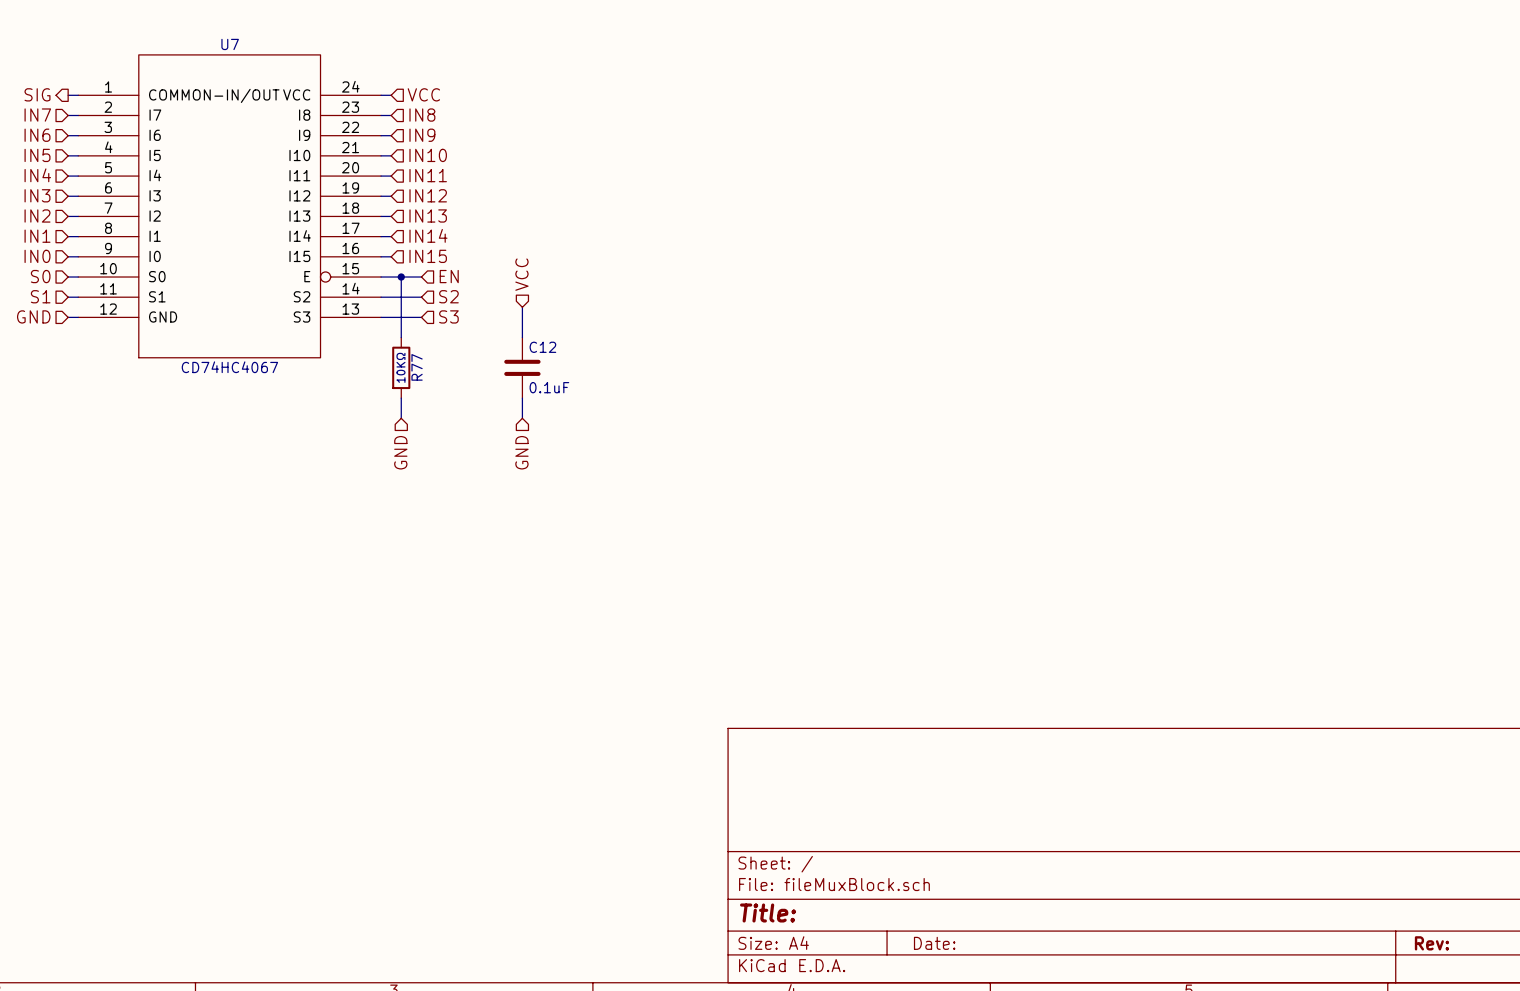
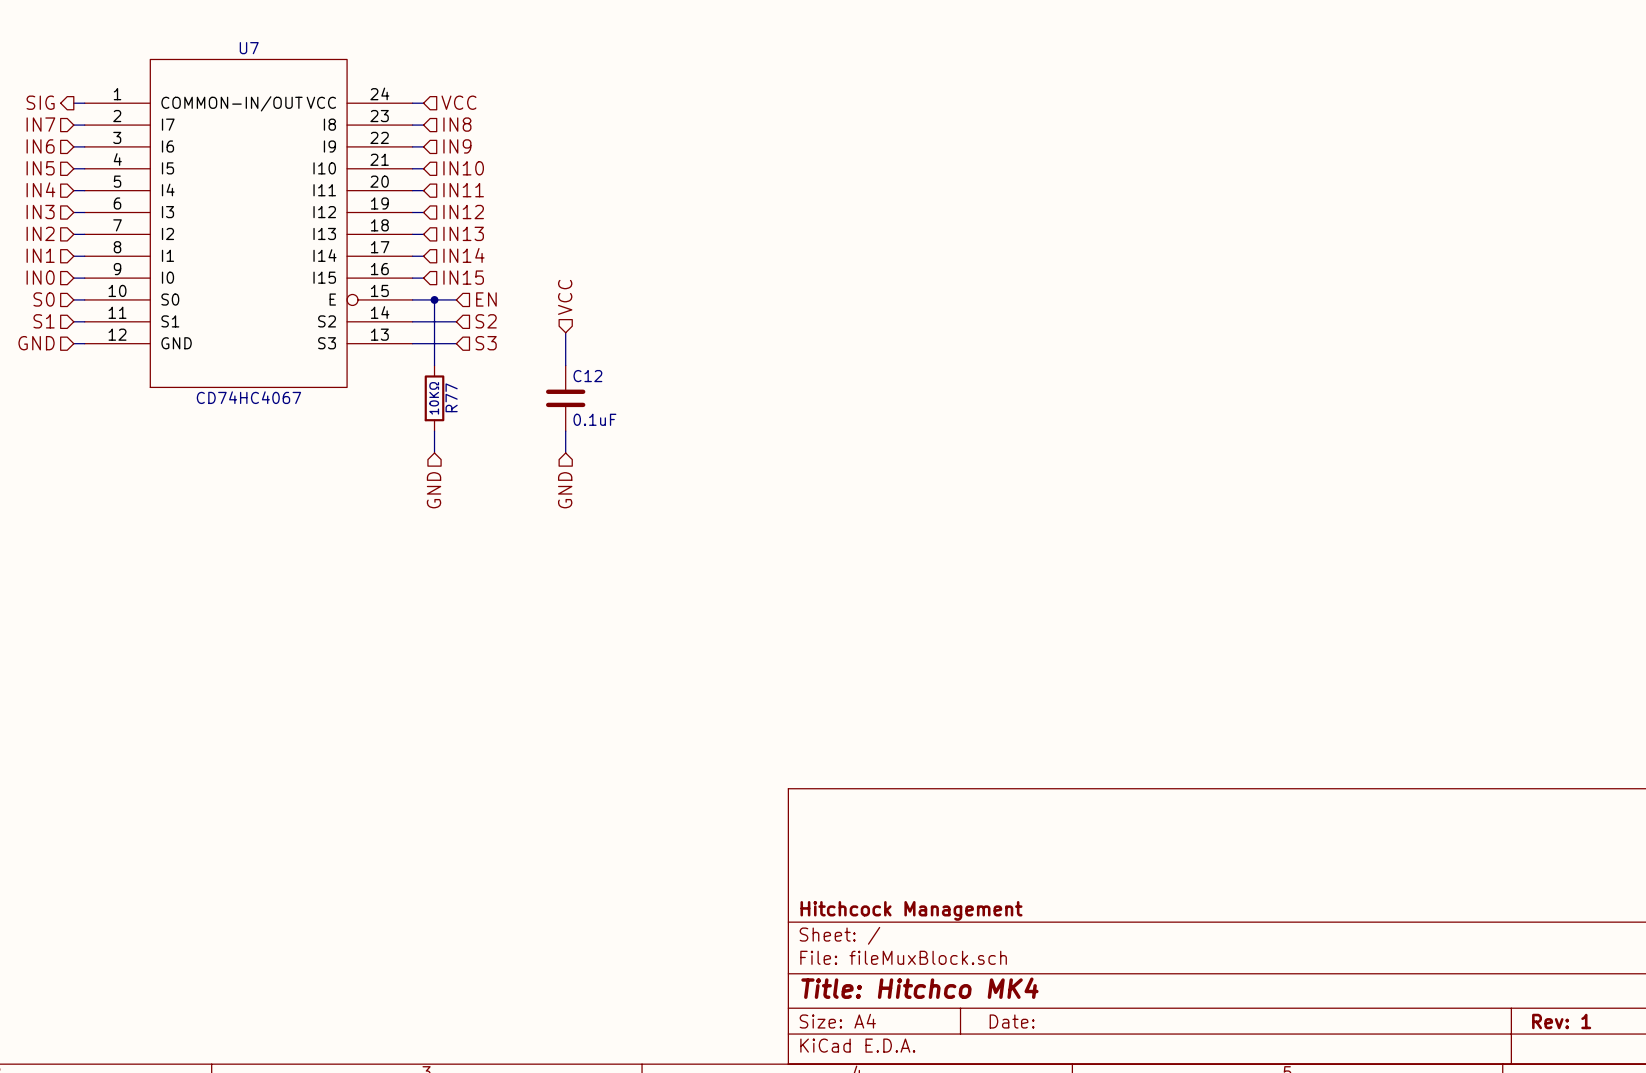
title block: none -> Hitchcock Management (911, 910)
title block: Title: (768, 912) -> Title: Hitchco MK4 (919, 988)
title block: Rev: (1431, 943) -> Rev: 1 (1561, 1021)

